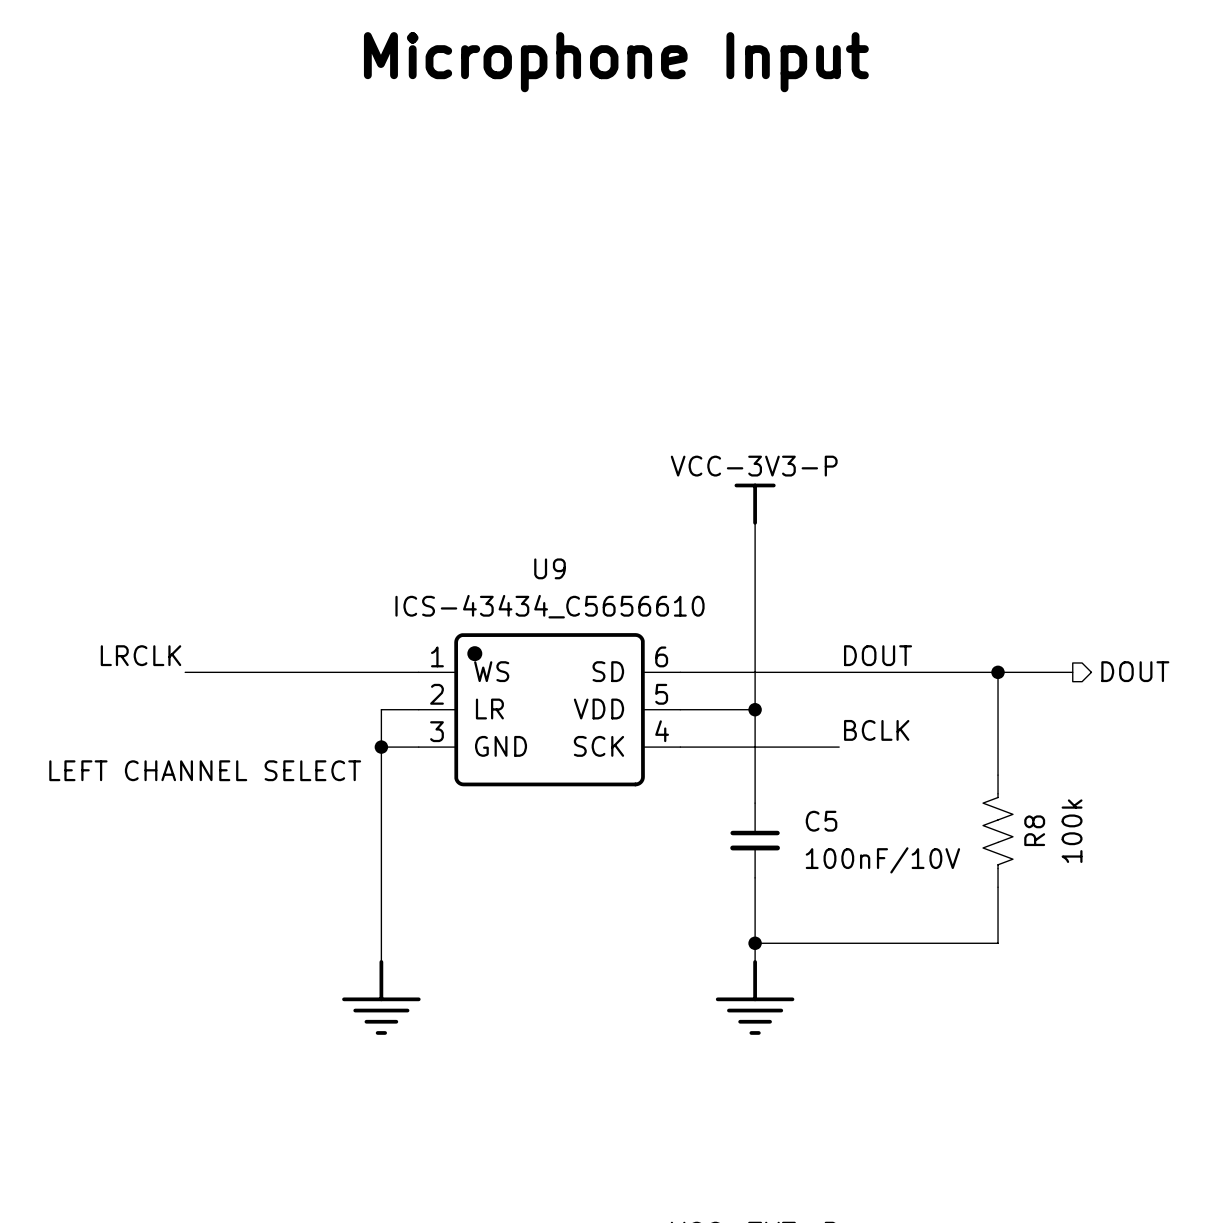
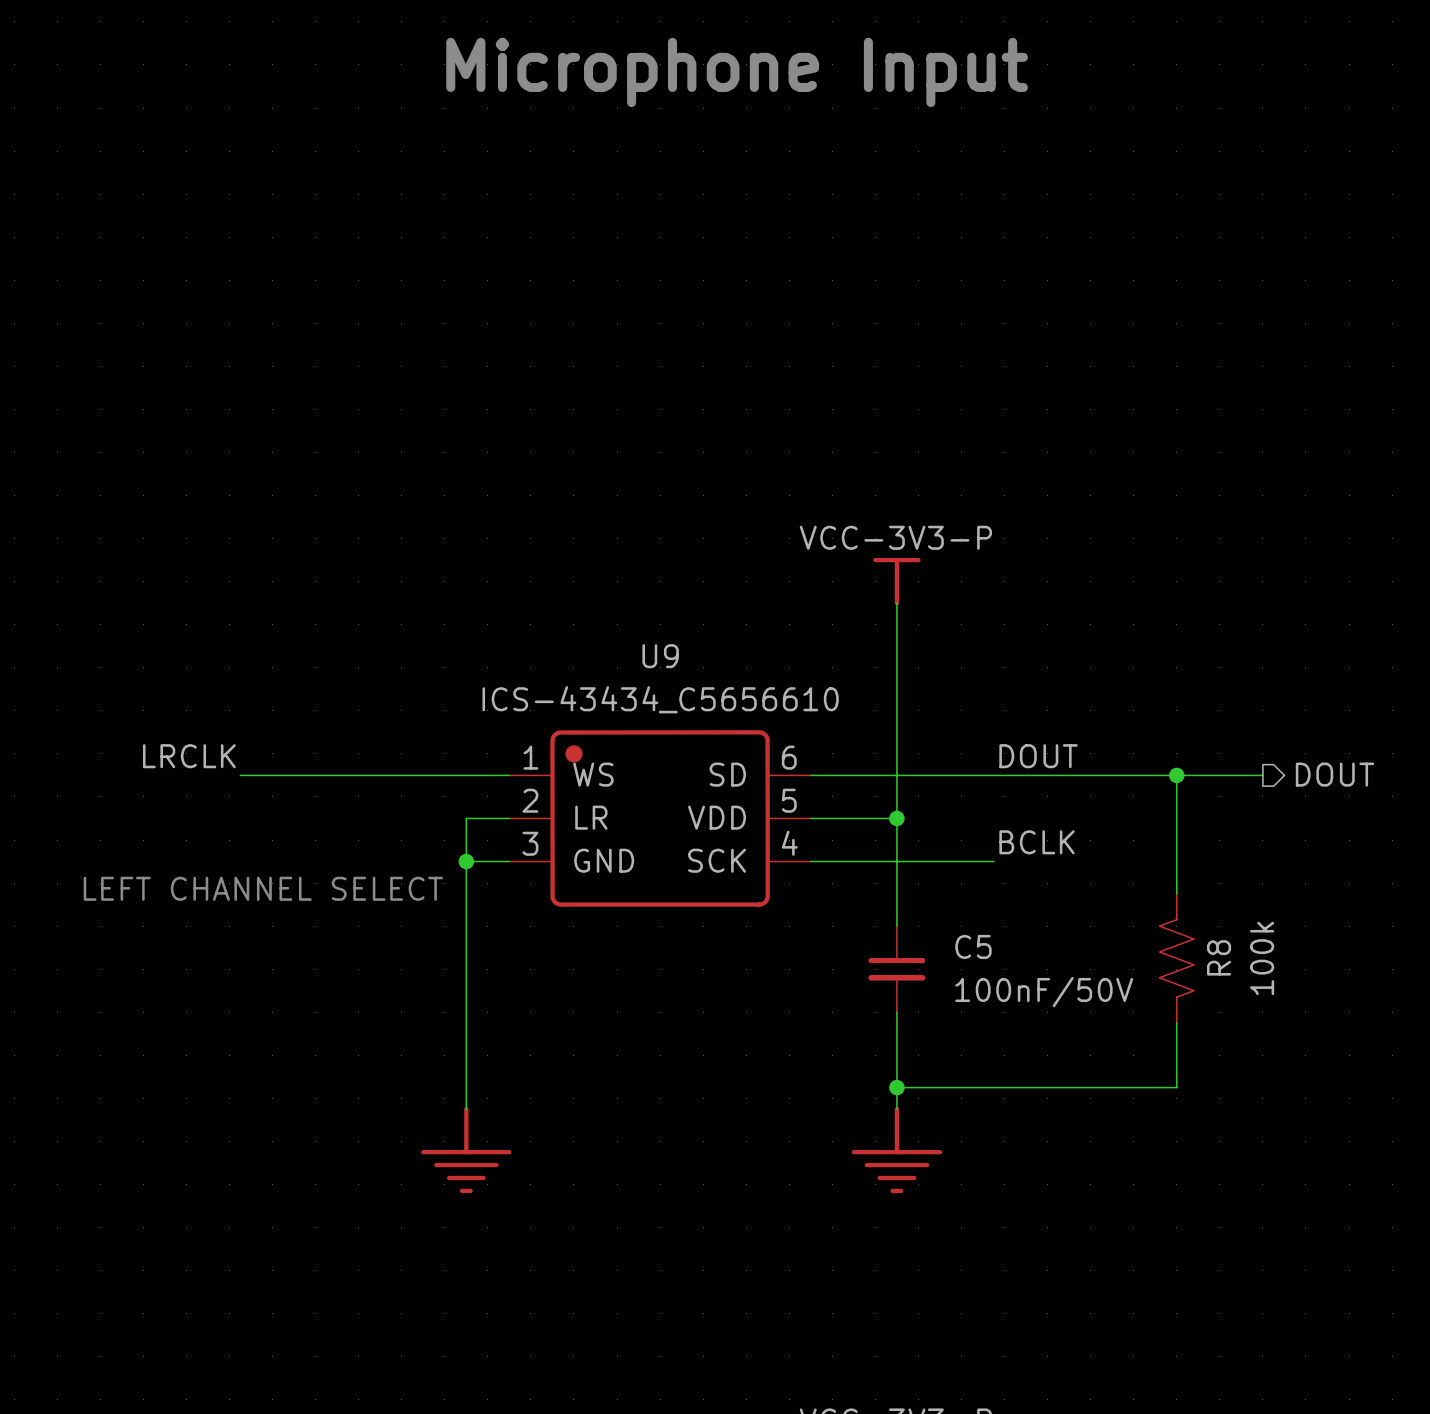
C5 value: 100nF/10V (882, 860) -> 100nF/50V (1044, 992)

